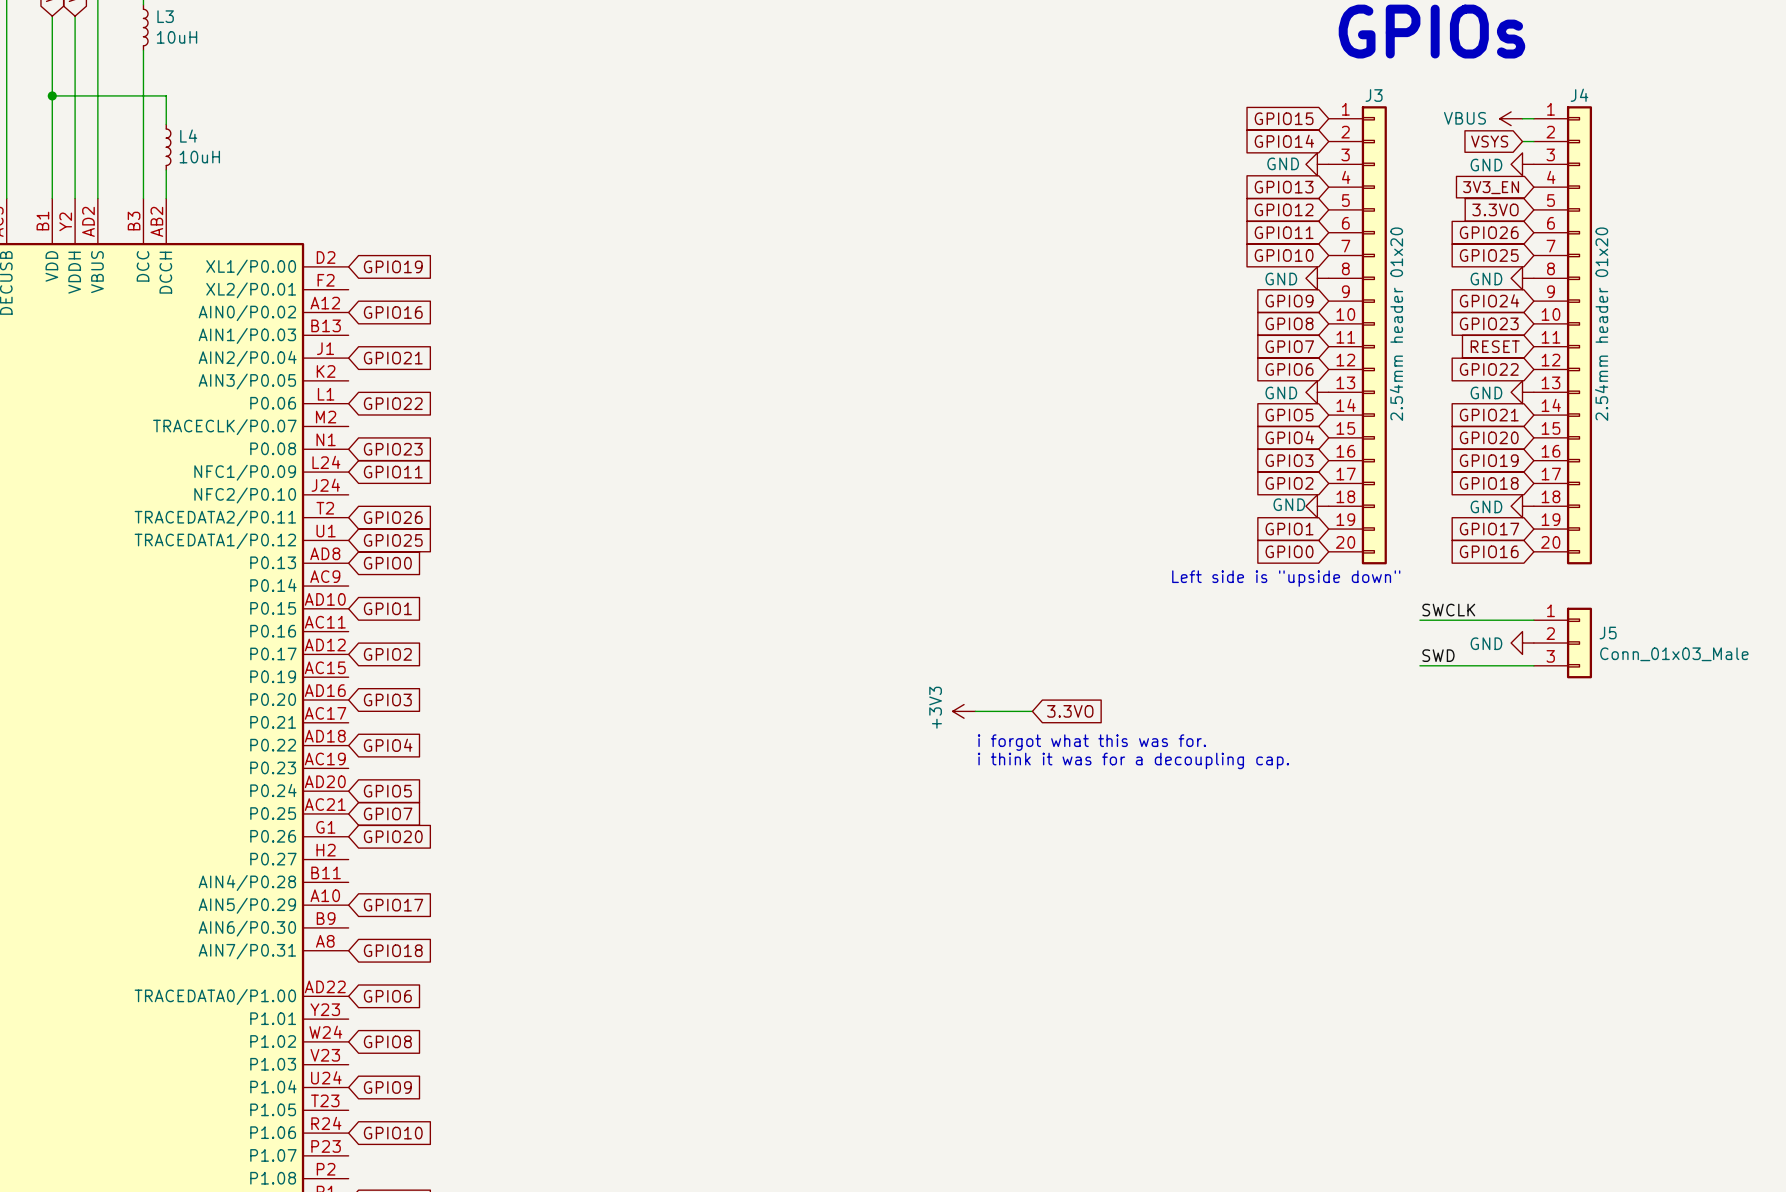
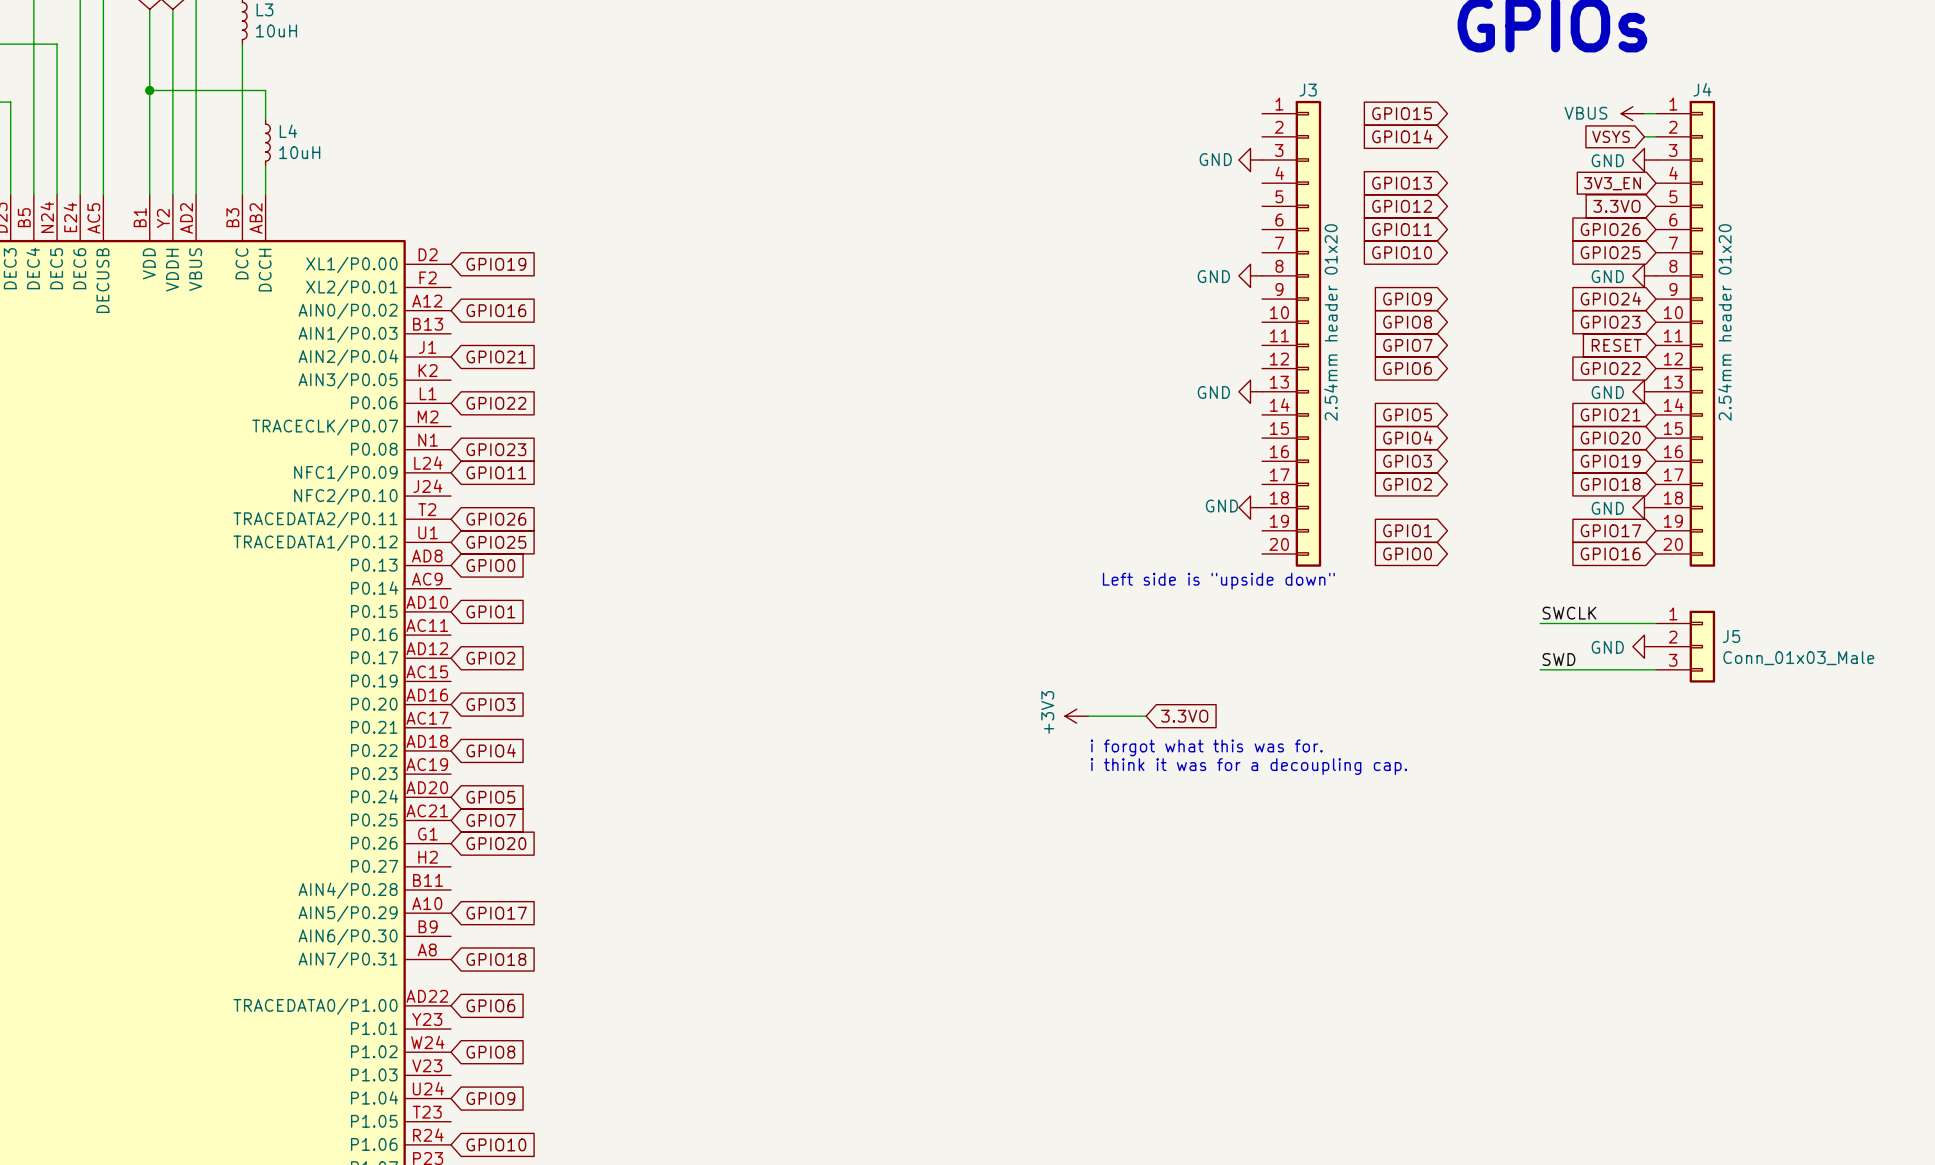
power symbol: none -> GND (1250, 160)
power symbol: GND (1317, 164) -> none
power symbol: none -> GND (1250, 275)
power symbol: GND (1317, 278) -> none
J3 position: (1357, 335) -> (1291, 333)
power symbol: none -> GND (1250, 391)
power symbol: GND (1317, 392) -> none
power symbol: none -> GND (1250, 507)
power symbol: GND (1317, 506) -> none
text position: Left side is "upside down" (1286, 578) -> Left side is "upside down" (1218, 581)

